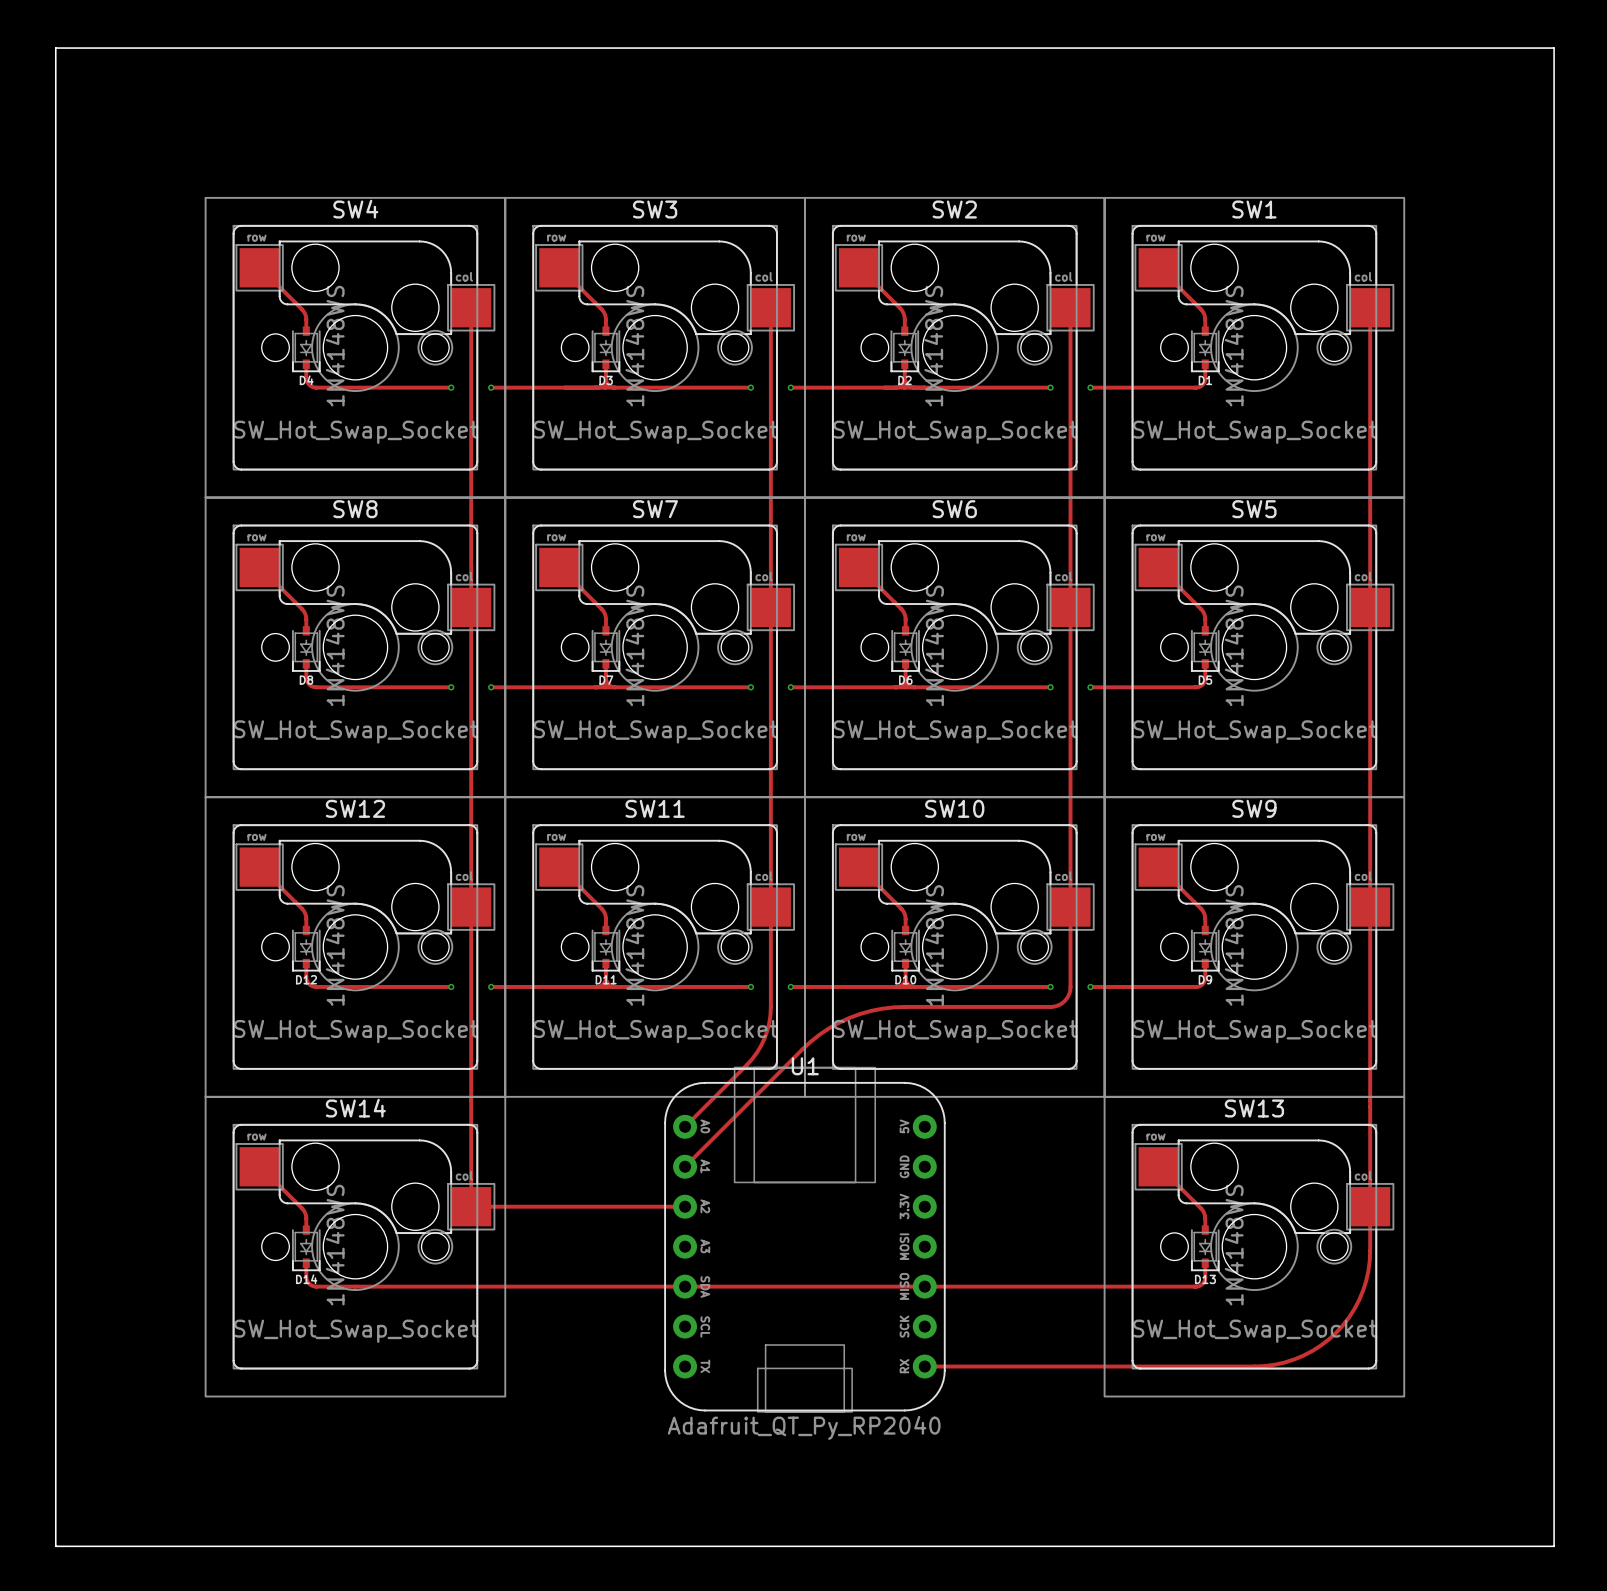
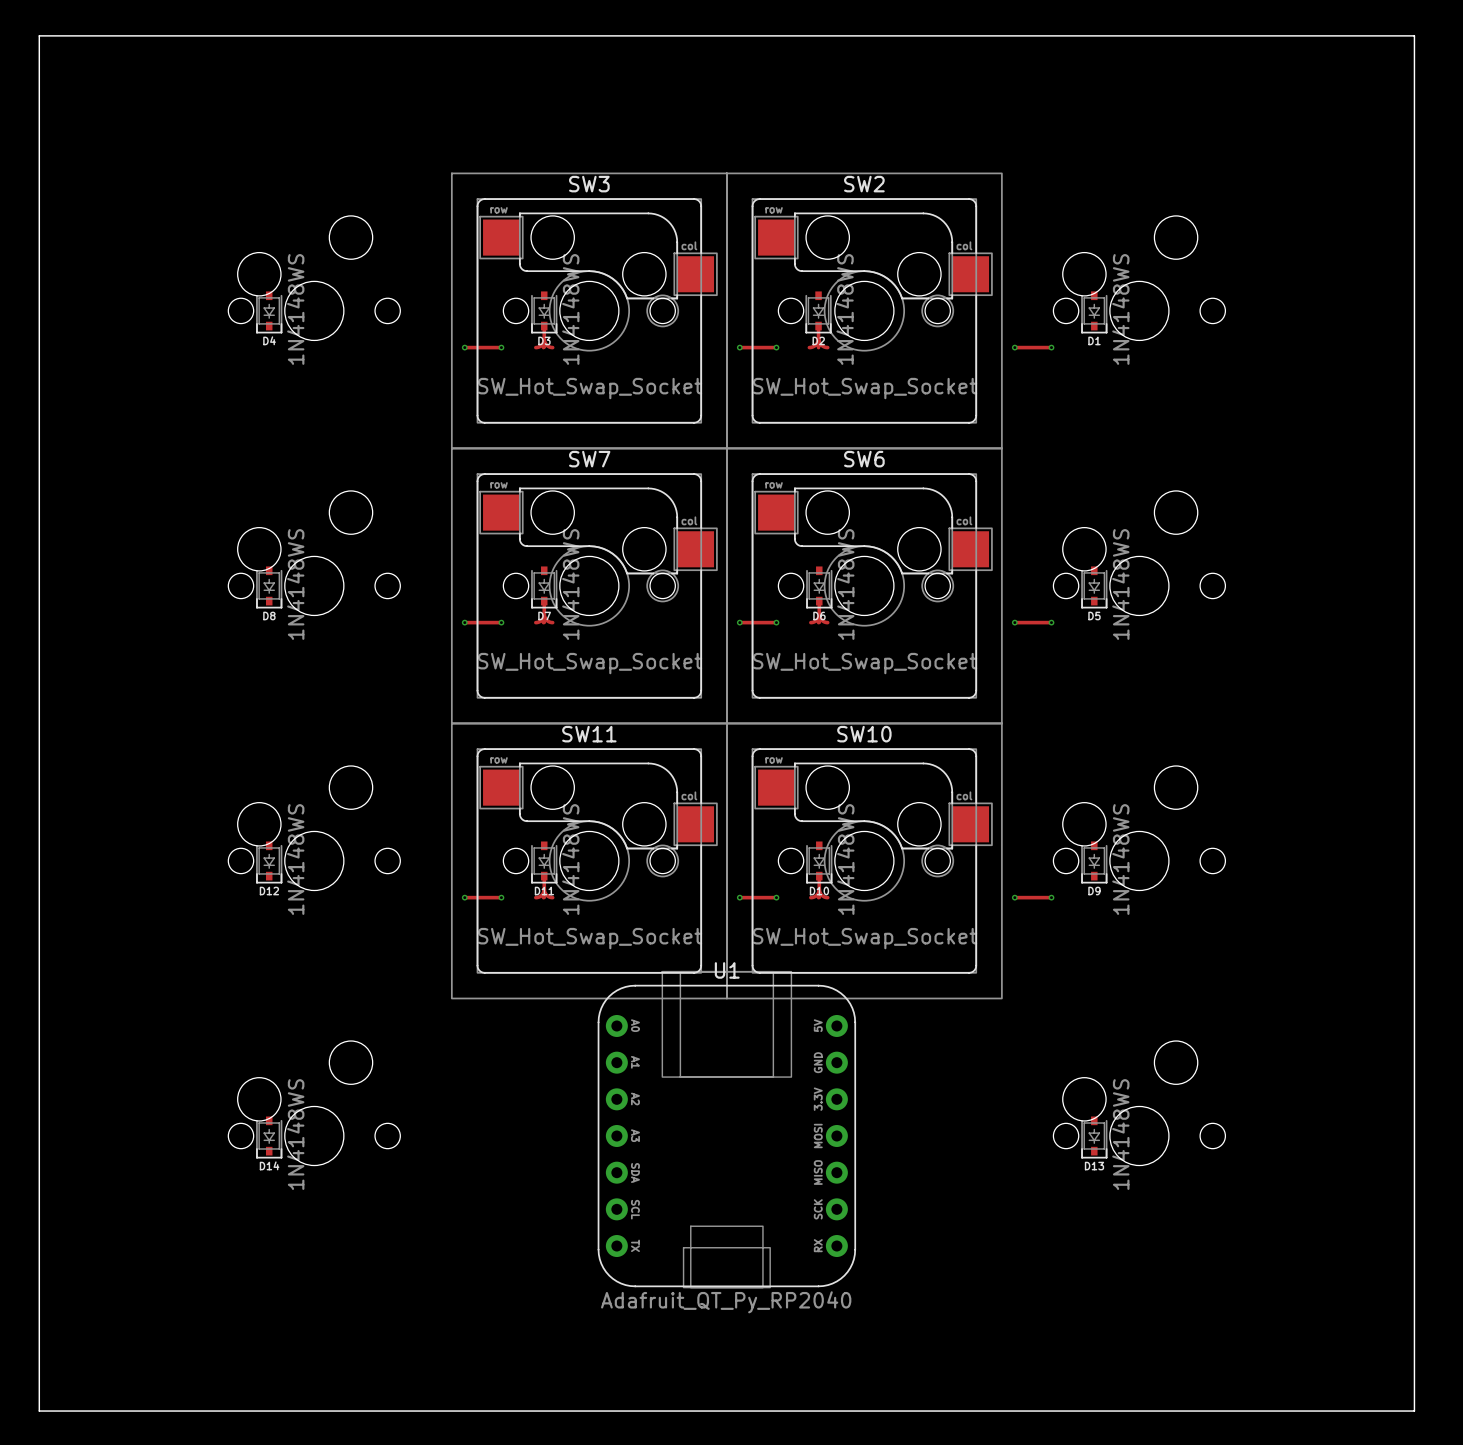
track: (259, 267) (303, 311) (306, 318) (306, 331) -> none
track: (559, 267) (603, 311) (605, 318) (605, 331) -> none
track: (858, 267) (902, 310) (904, 318) (904, 331) -> none
track: (1158, 267) (1202, 311) (1205, 318) (1205, 331) -> none
track: (471, 307) (471, 1206) (685, 1206) -> none
track: (770, 307) (770, 1015) (764, 1038) (752, 1059) (685, 1126) -> none
track: (1070, 307) (1070, 986) (1068, 995) (1061, 1003) (1052, 1006) (893, 1007) (871, 1010) (849, 1017) (829, 1028) (810, 1041) (685, 1166) -> none
track: (1370, 307) (1370, 1250) (1368, 1270) (1359, 1299) (1343, 1325) (1320, 1345) (1294, 1359) (1274, 1364) (1254, 1366) (924, 1366) -> none
part: none -> (314, 278)
part: none -> (1139, 278)
SW4: SW_Hot_Swap_Socket (355, 347) -> none
SW1: SW_Hot_Swap_Socket (1254, 347) -> none
track: (306, 364) (306, 380) (310, 385) (315, 387) (451, 387) -> none
track: (1205, 364) (1205, 380) (1200, 386) (1158, 387) -> none
via: (451, 387) -> none
track: (491, 387) (519, 387) -> none
via position: (491, 387) -> (464, 347)
track: (559, 387) (750, 387) -> none
via: none -> (501, 347)
via: (750, 387) -> none
track: (790, 387) (819, 387) -> none
via position: (790, 387) -> (739, 347)
track: (858, 387) (1050, 387) -> none
via: none -> (776, 347)
via: (1050, 387) -> none
track: (1090, 387) (1118, 387) -> none
via position: (1090, 387) -> (1014, 347)
via: none -> (1051, 347)
track: (259, 566) (303, 611) (306, 617) (306, 630) -> none
track: (559, 566) (603, 611) (605, 617) (605, 630) -> none
track: (858, 566) (903, 611) (905, 617) (905, 630) -> none
track: (1158, 566) (1202, 611) (1205, 617) (1205, 630) -> none
part: none -> (314, 553)
part: none -> (1139, 553)
SW8: SW_Hot_Swap_Socket (355, 647) -> none
SW5: SW_Hot_Swap_Socket (1254, 647) -> none
track: (306, 663) (306, 680) (310, 685) (315, 687) (451, 687) -> none
track: (1205, 663) (1205, 680) (1200, 686) (1158, 687) -> none
via: (451, 687) -> none
track: (491, 687) (519, 687) -> none
via position: (491, 687) -> (464, 622)
track: (559, 687) (750, 687) -> none
via: none -> (501, 622)
via: (750, 687) -> none
track: (790, 687) (819, 687) -> none
via position: (790, 687) -> (739, 622)
track: (858, 687) (1050, 687) -> none
via: none -> (776, 622)
via: (1050, 687) -> none
track: (1090, 687) (1118, 687) -> none
via position: (1090, 687) -> (1014, 622)
via: none -> (1051, 622)
track: (259, 866) (303, 910) (306, 917) (306, 930) -> none
track: (559, 866) (603, 910) (605, 917) (605, 930) -> none
track: (858, 866) (903, 910) (905, 917) (905, 930) -> none
track: (1158, 866) (1202, 910) (1205, 917) (1205, 930) -> none
part: none -> (314, 828)
part: none -> (1139, 828)
SW12: SW_Hot_Swap_Socket (355, 947) -> none
SW9: SW_Hot_Swap_Socket (1254, 947) -> none
track: (306, 963) (306, 980) (310, 984) (315, 986) (451, 986) -> none
track: (1205, 963) (1205, 979) (1200, 986) (1158, 986) -> none
via: (451, 986) -> none
track: (491, 986) (519, 986) -> none
via position: (491, 986) -> (464, 897)
track: (559, 986) (750, 986) -> none
via: none -> (501, 897)
via: (750, 986) -> none
track: (790, 986) (819, 986) -> none
via position: (790, 986) -> (739, 897)
track: (858, 986) (1050, 986) -> none
via: none -> (776, 897)
via: (1050, 986) -> none
track: (1090, 986) (1118, 986) -> none
via position: (1090, 986) -> (1014, 897)
via: none -> (1051, 897)
track: (259, 1165) (303, 1210) (306, 1217) (306, 1230) -> none
track: (1158, 1165) (1202, 1210) (1205, 1217) (1205, 1230) -> none
part: none -> (314, 1103)
part: none -> (1139, 1103)
SW14: SW_Hot_Swap_Socket (355, 1246) -> none
SW13: SW_Hot_Swap_Socket (1254, 1246) -> none
track: (306, 1263) (307, 1280) (310, 1285) (316, 1286) (1196, 1286) (1201, 1284) (1204, 1280) (1205, 1263) -> none

